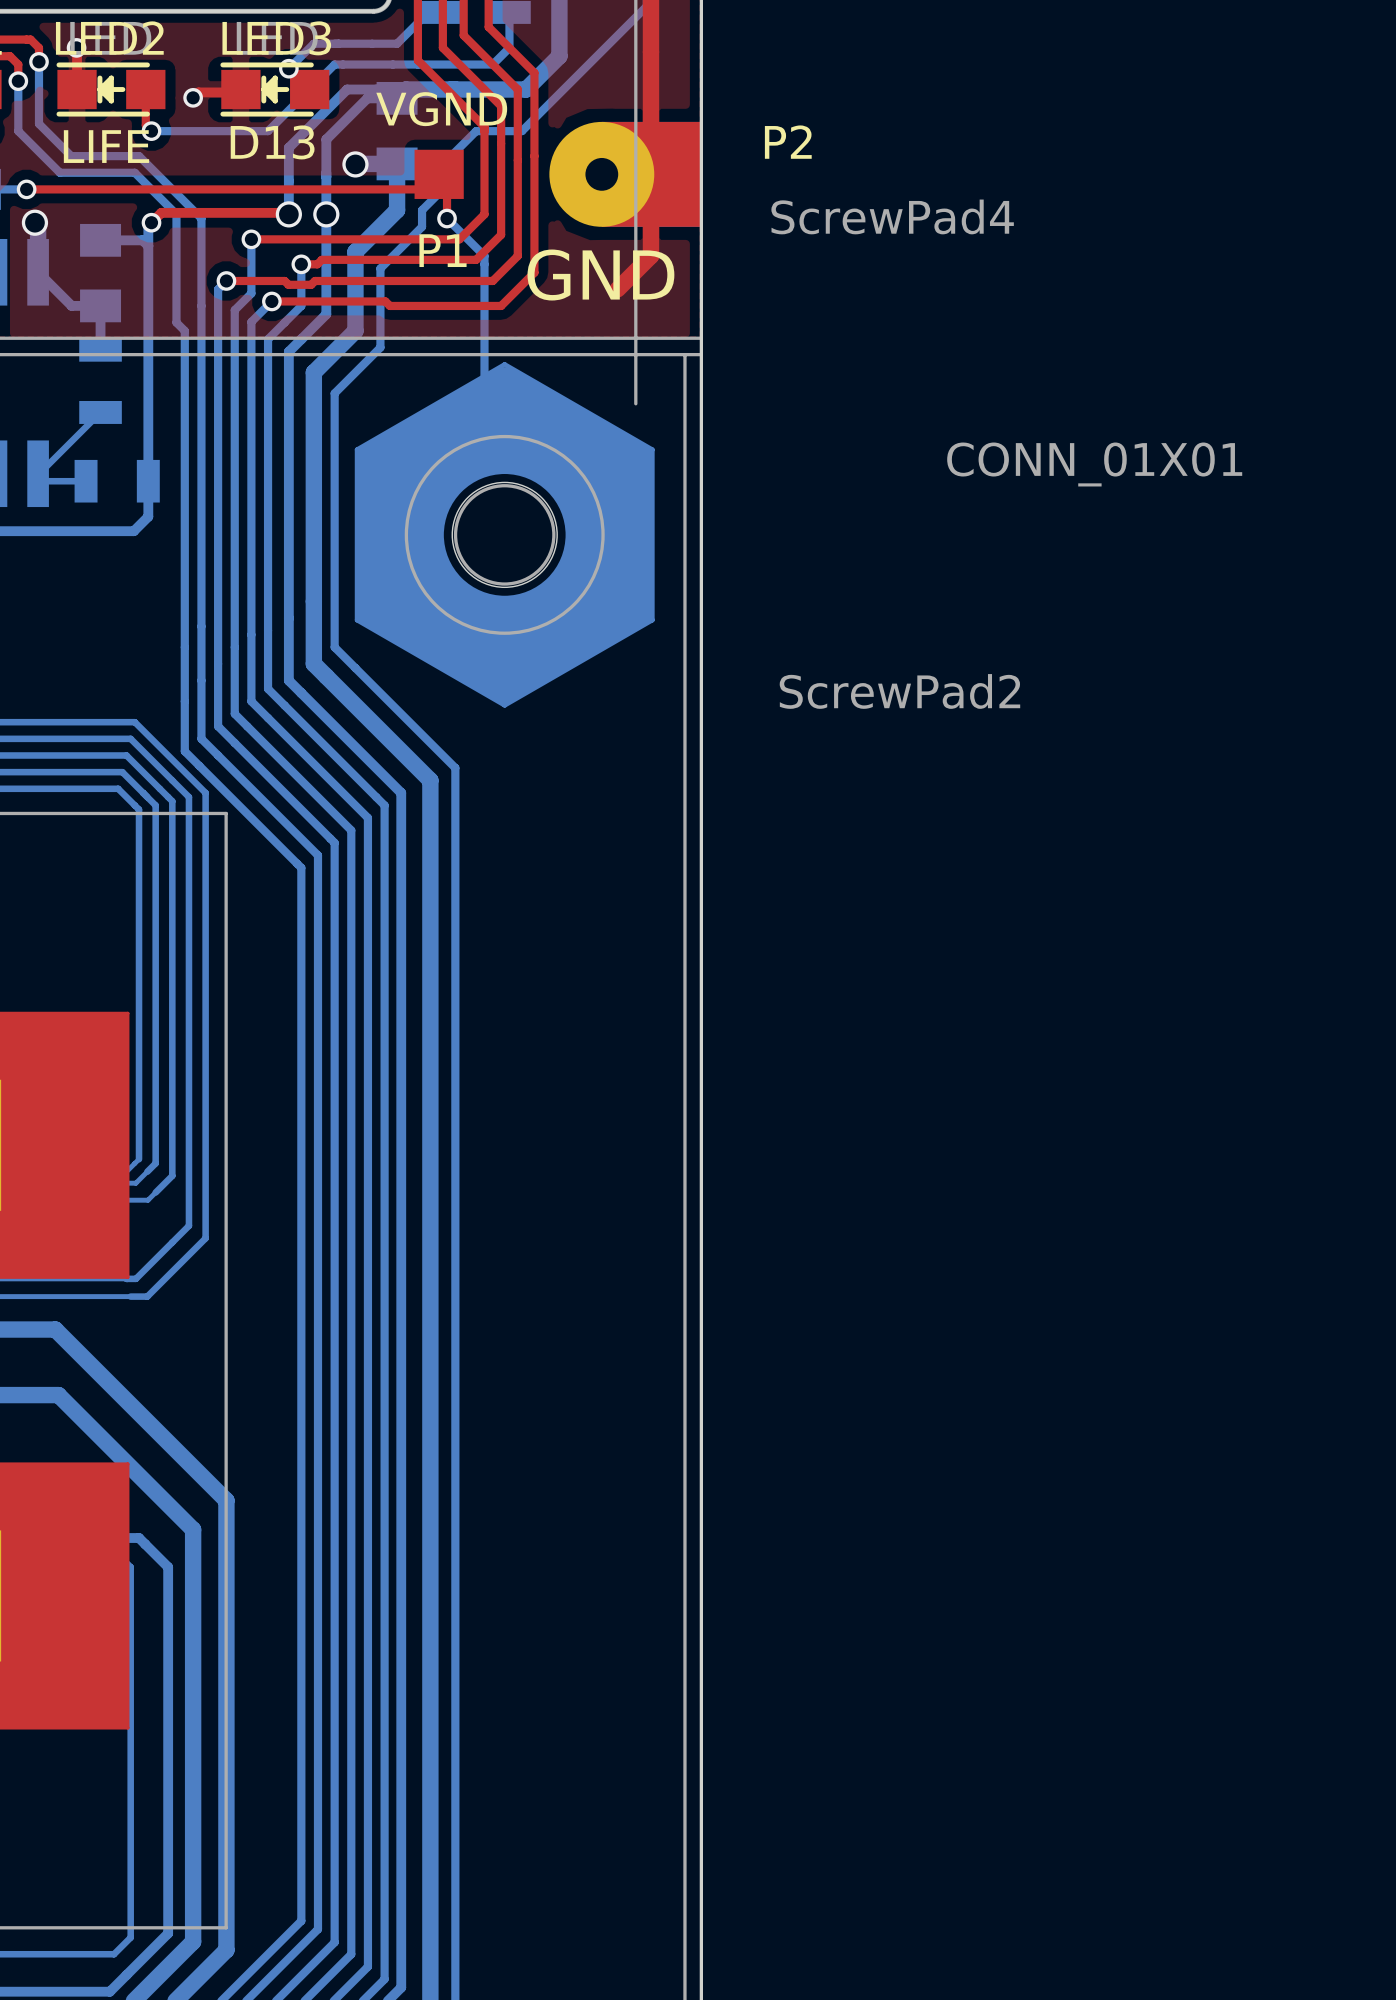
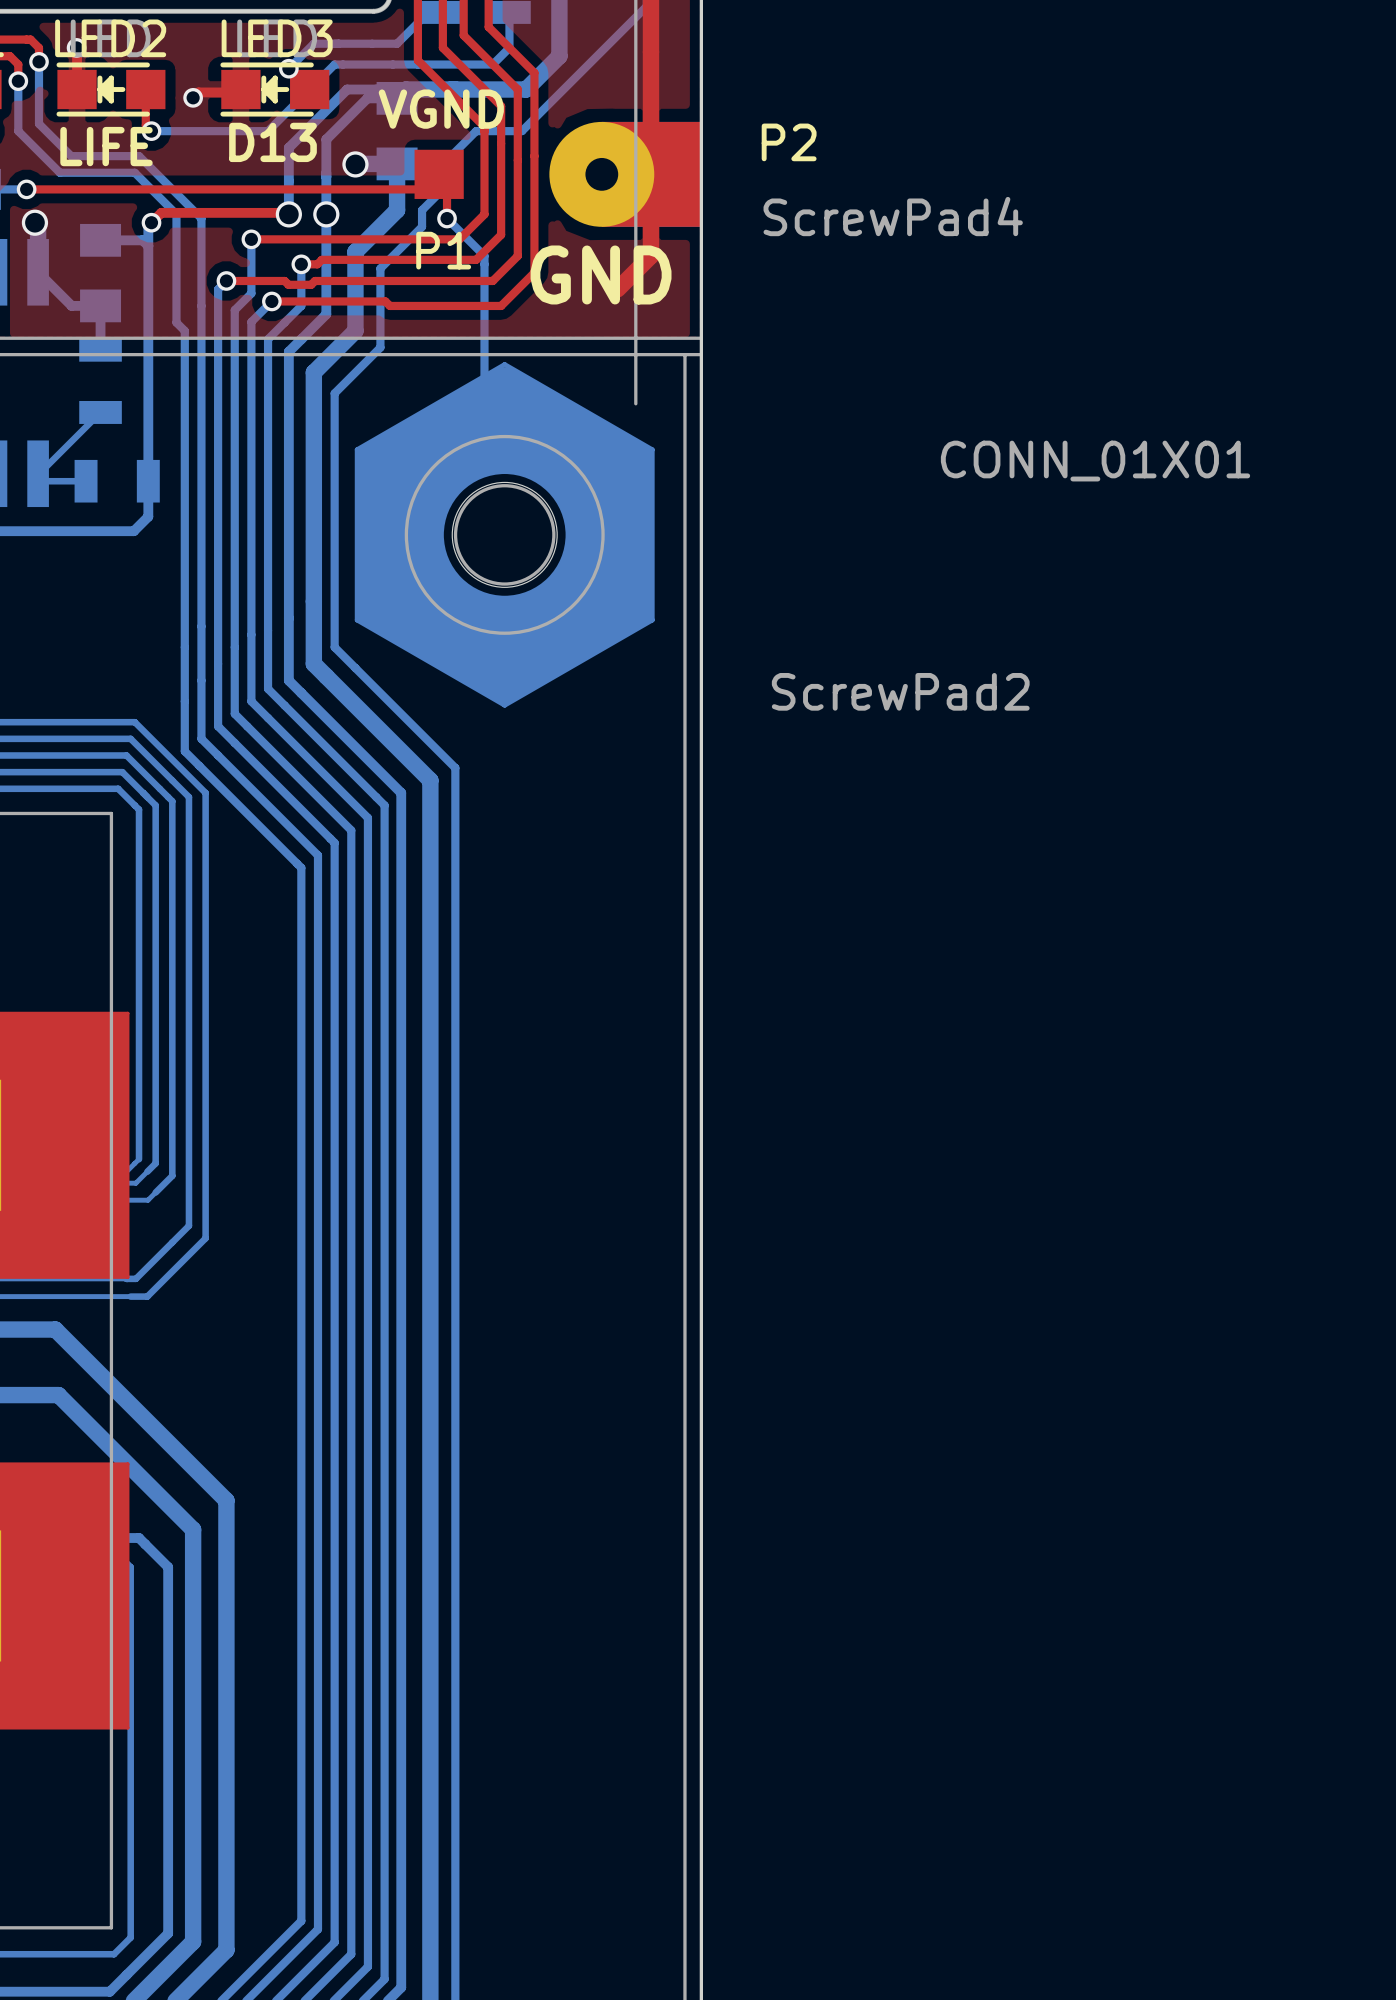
line: (111, 813) (226, 813) (226, 1927) (111, 1927) -> (111, 813) (111, 1927)

